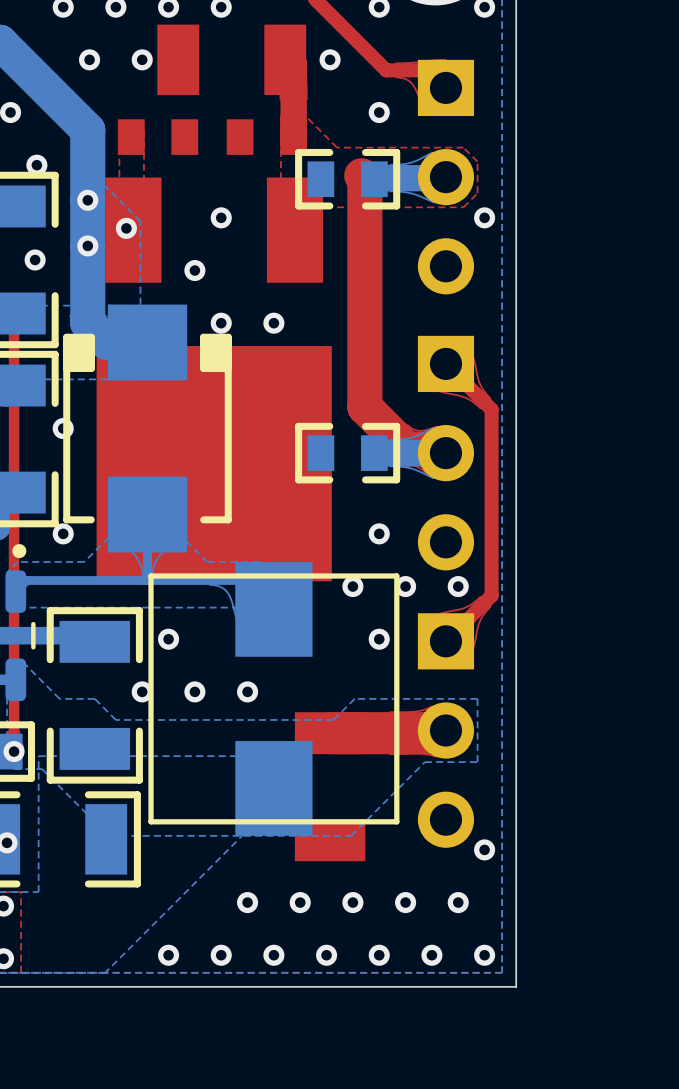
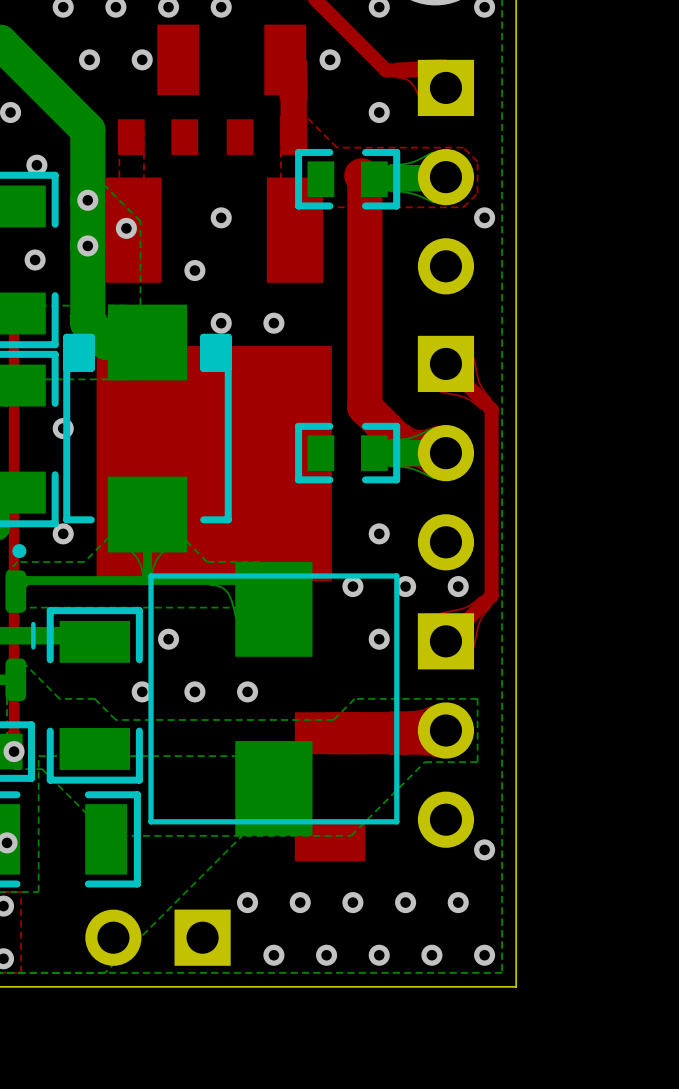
part: none -> (158, 937)
via: (168, 955) -> none
via: (221, 955) -> none

